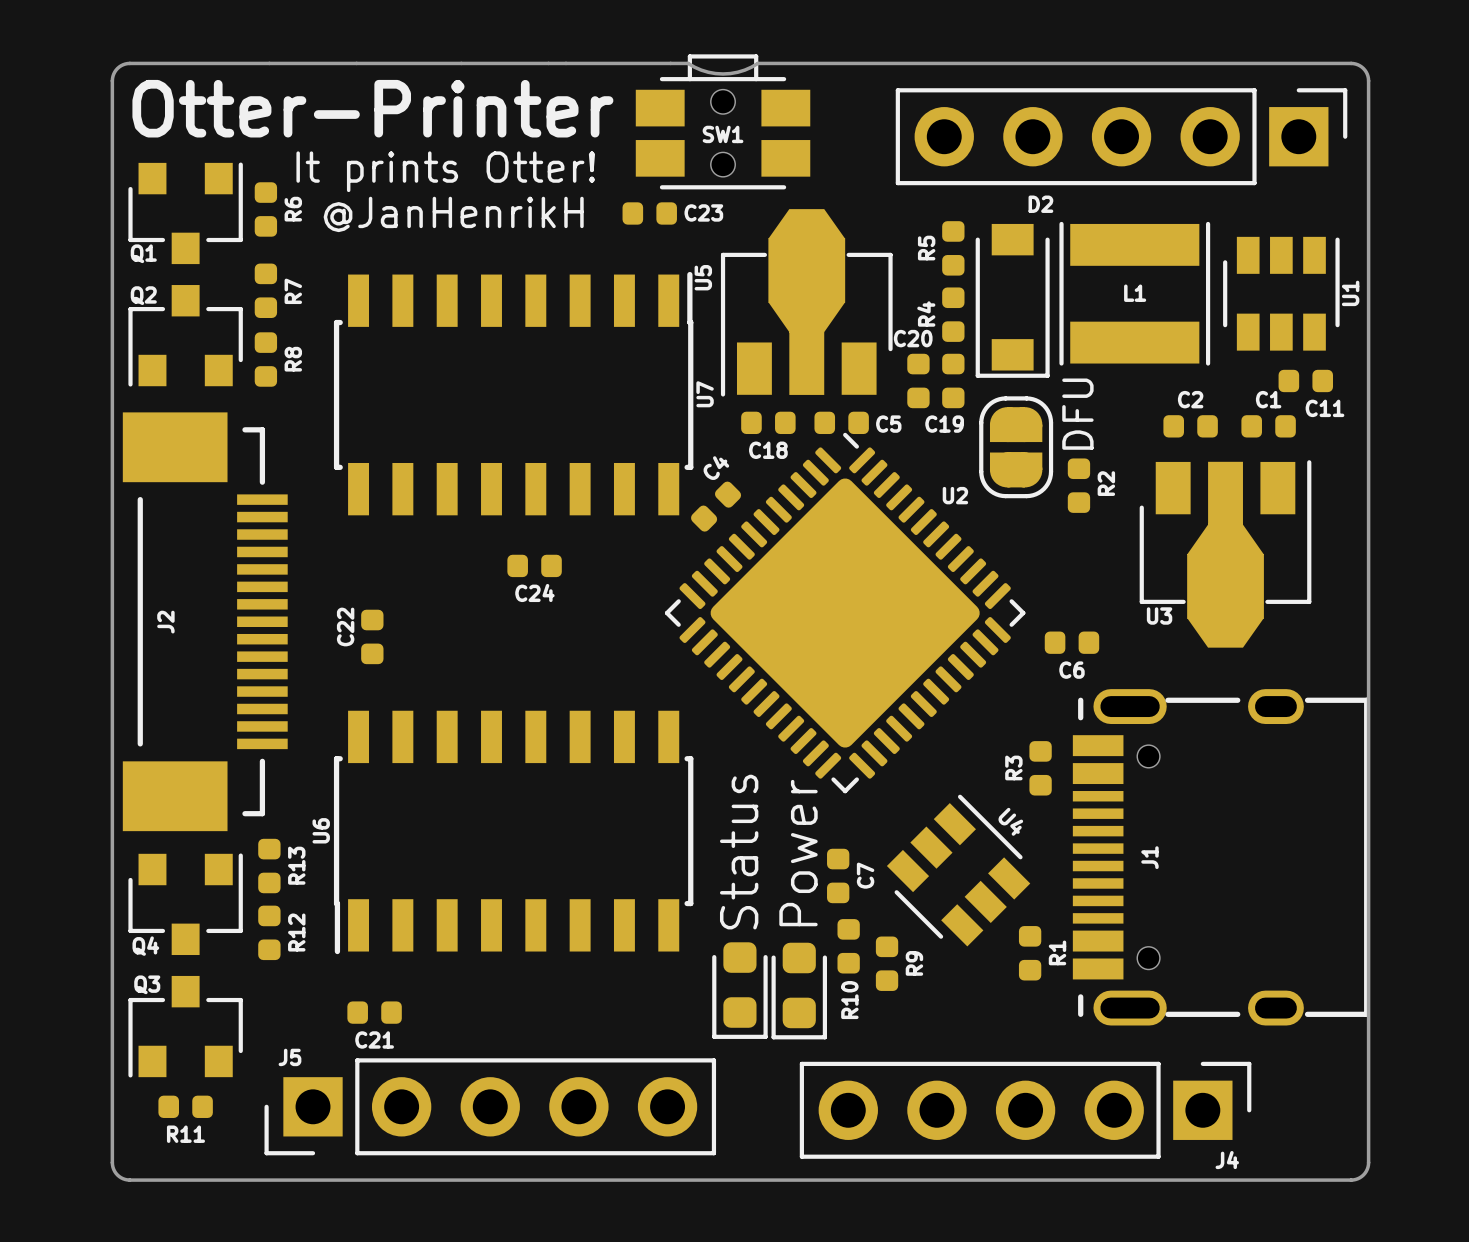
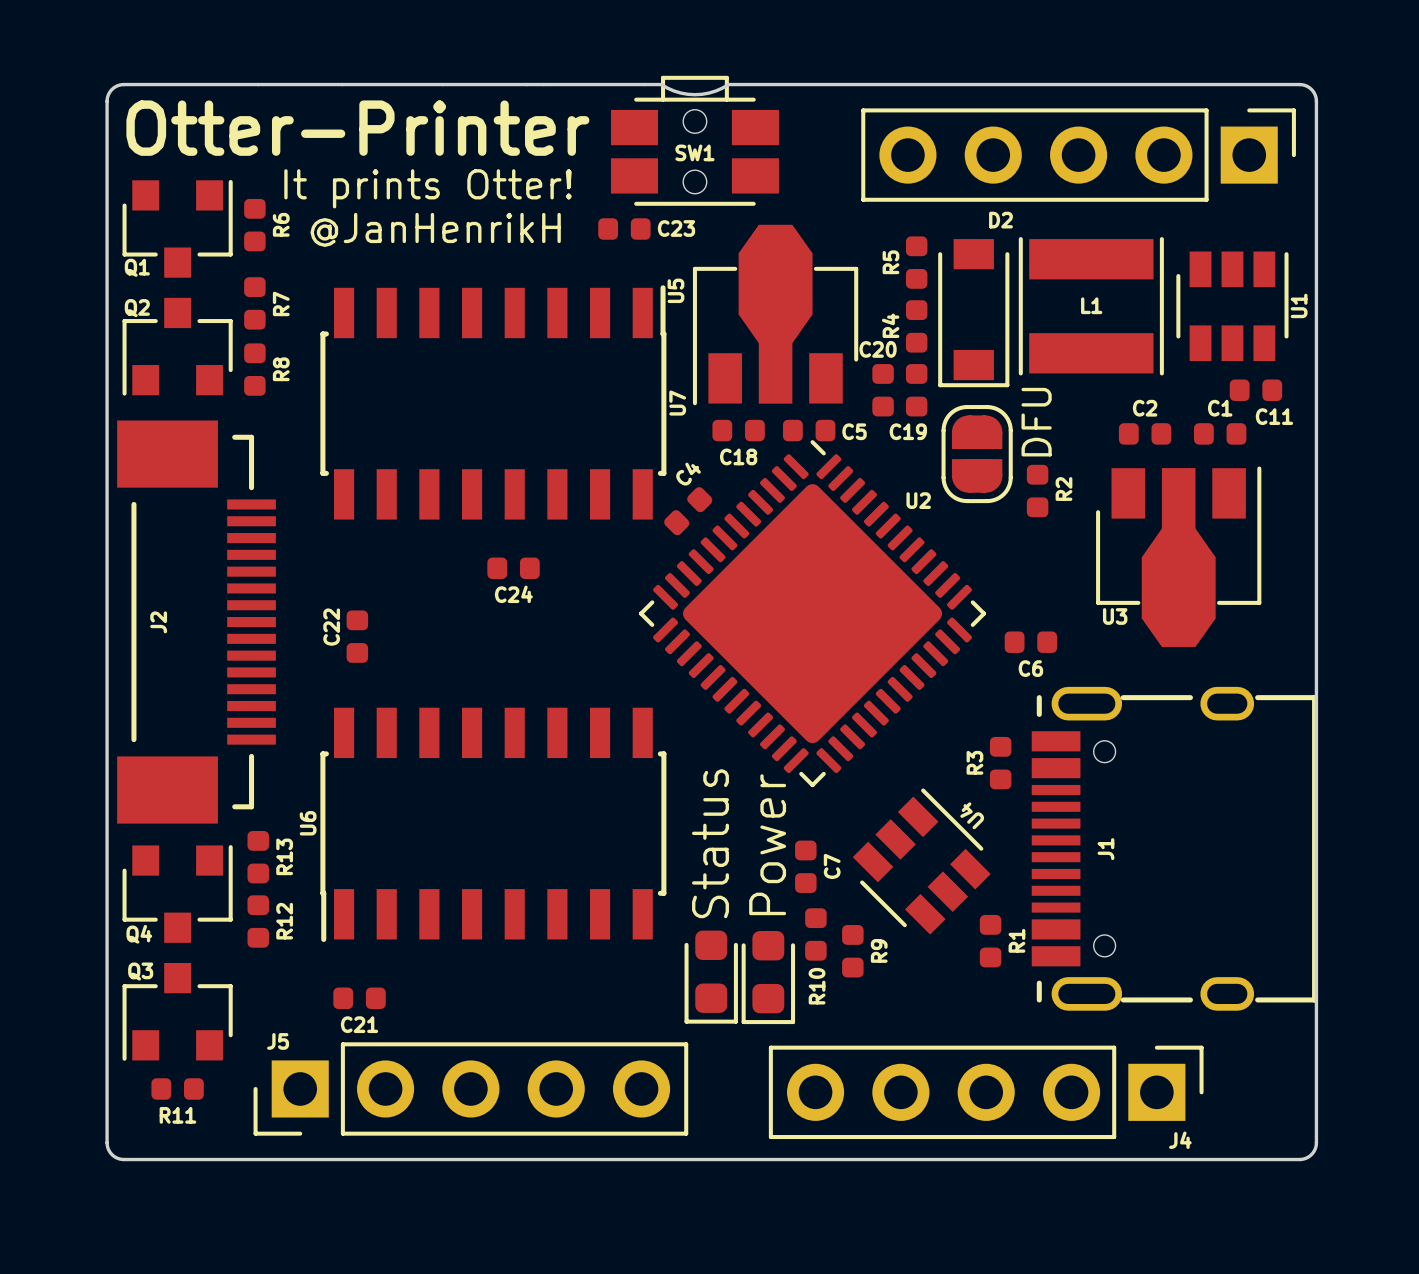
U4 name rotation: 0° (1010, 821) -> 180° (972, 815)

